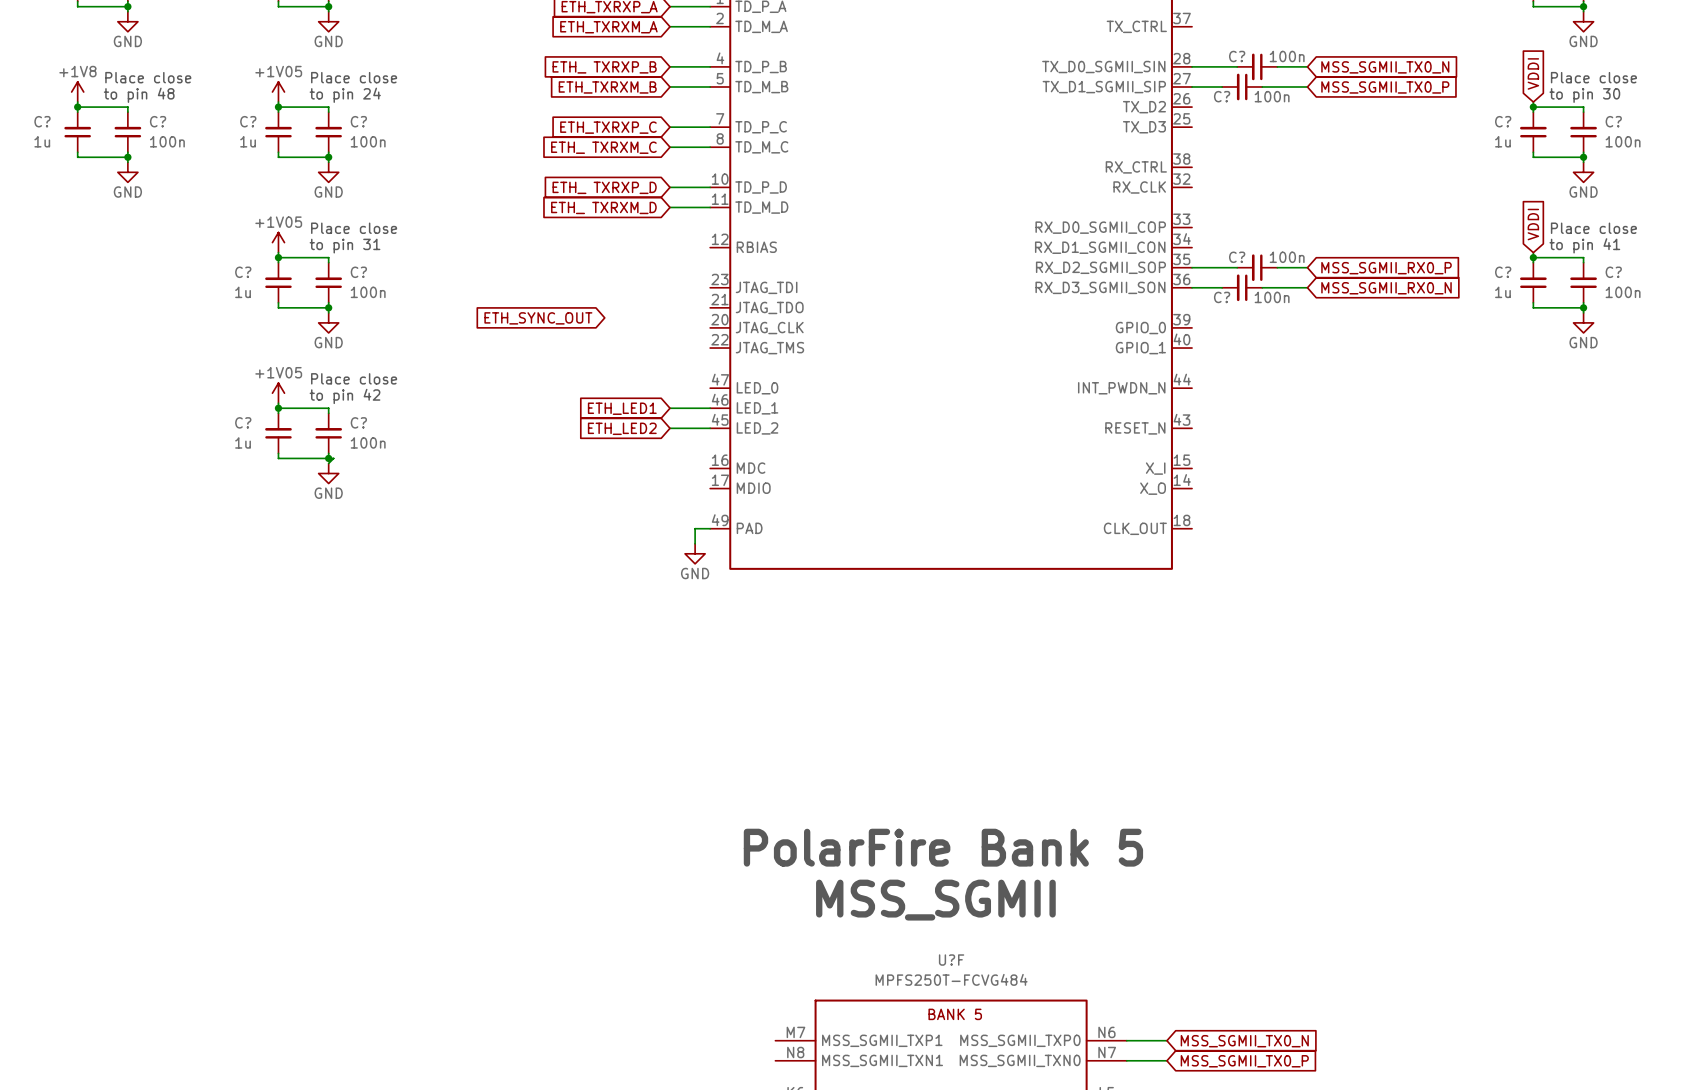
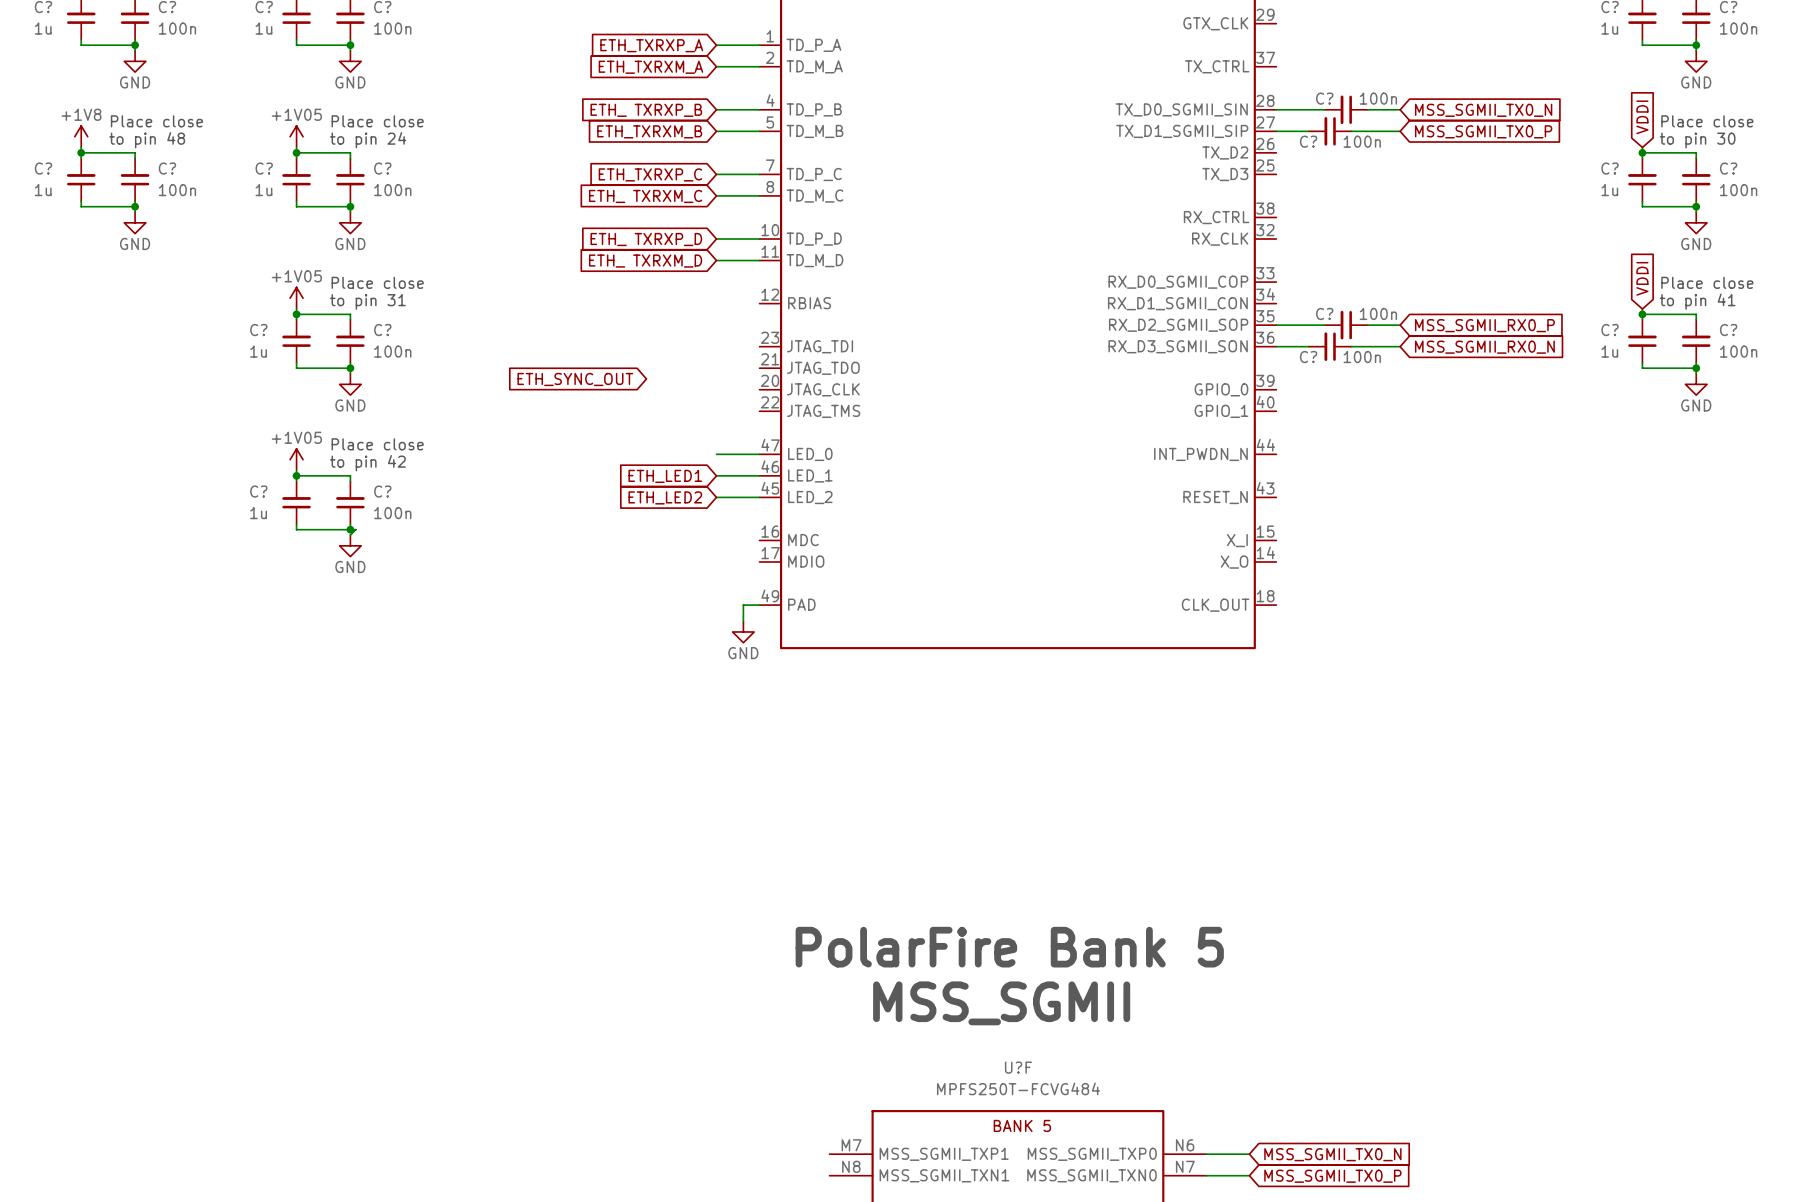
wire: none -> (716, 454) (759, 454)

